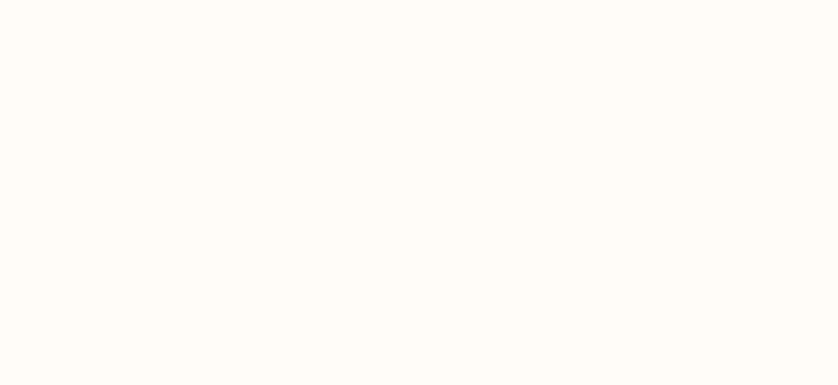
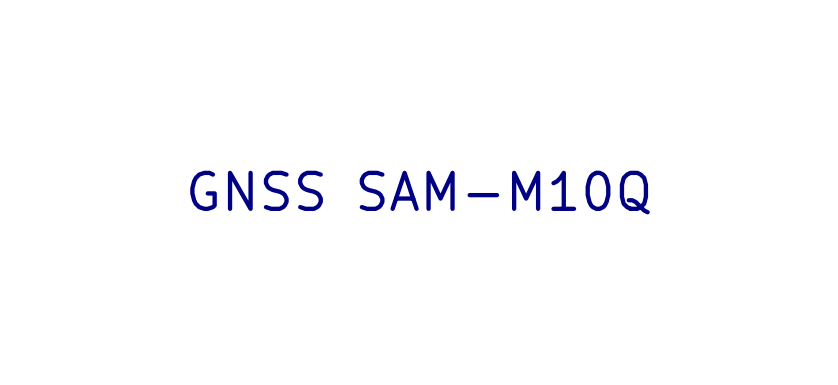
text: none -> GNSS SAM-M10Q (420, 192)

